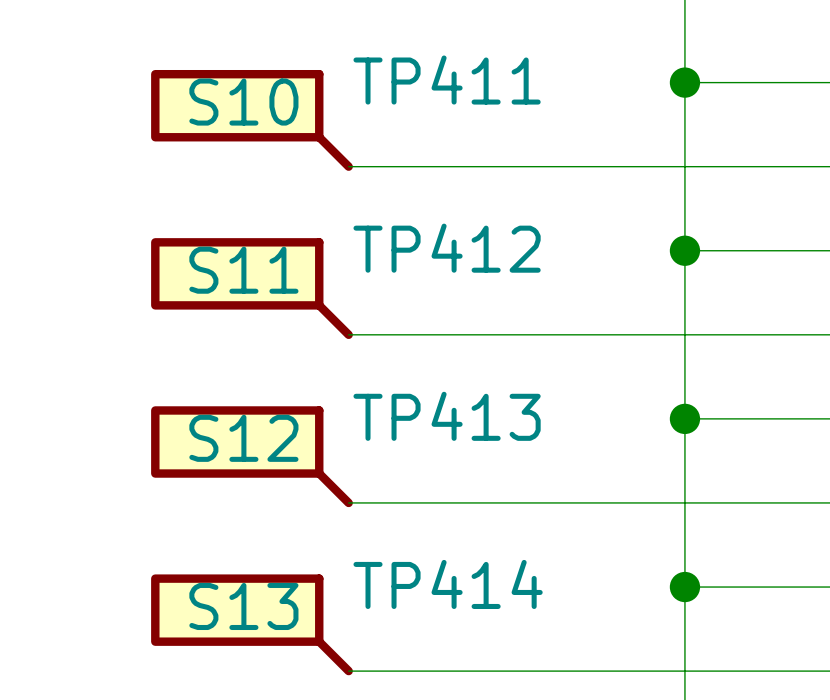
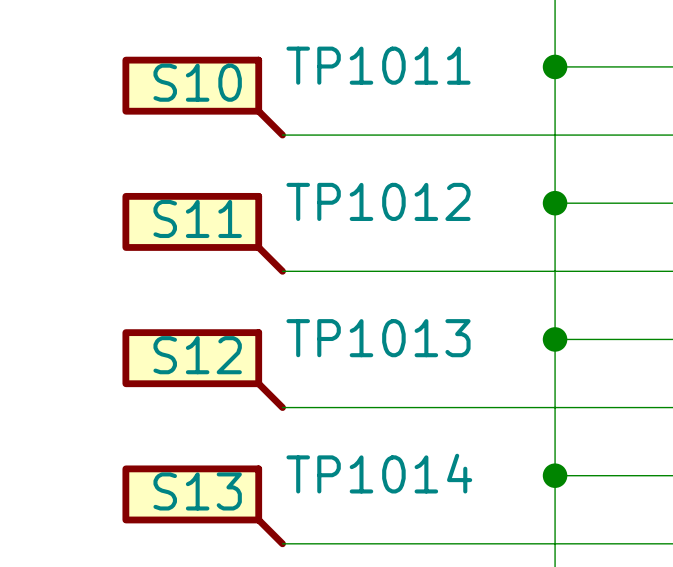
TP411 name: TP411 (447, 80) -> TP1011 (378, 65)
TP412 name: TP412 (447, 248) -> TP1012 (378, 201)
TP413 name: TP413 (447, 416) -> TP1013 (378, 338)
TP414 name: TP414 (448, 584) -> TP1014 (379, 473)

